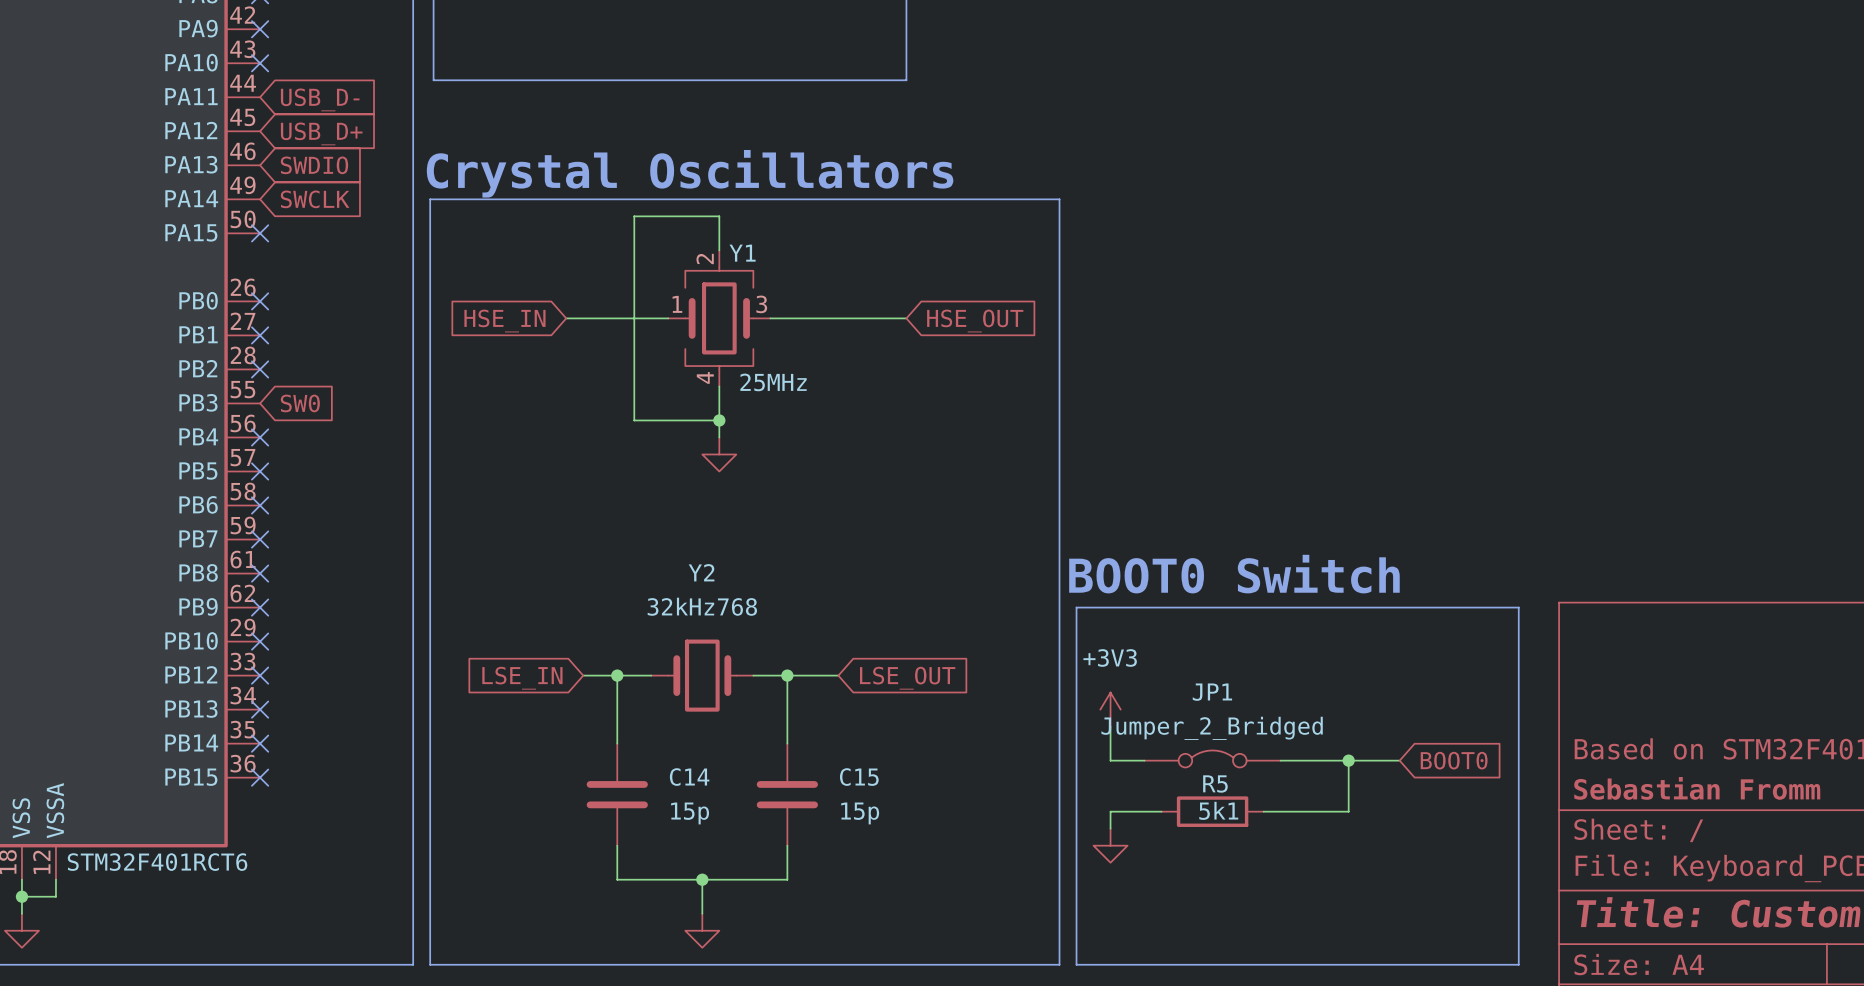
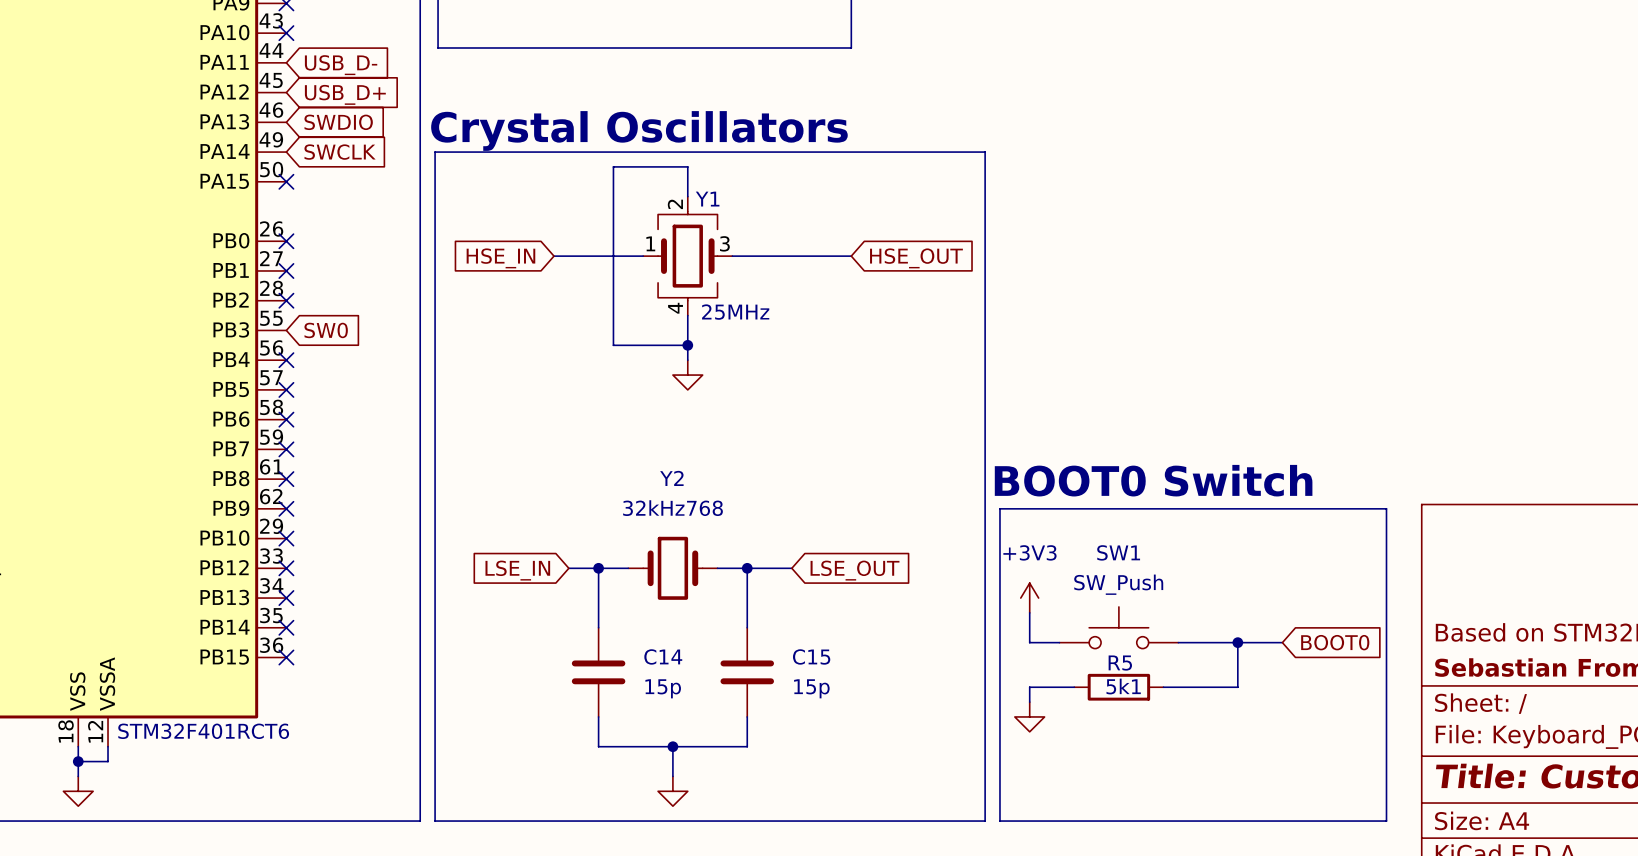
SW1: none -> SW_Push (1118, 627)
JP1: Jumper_2_Bridged (1212, 758) -> none

